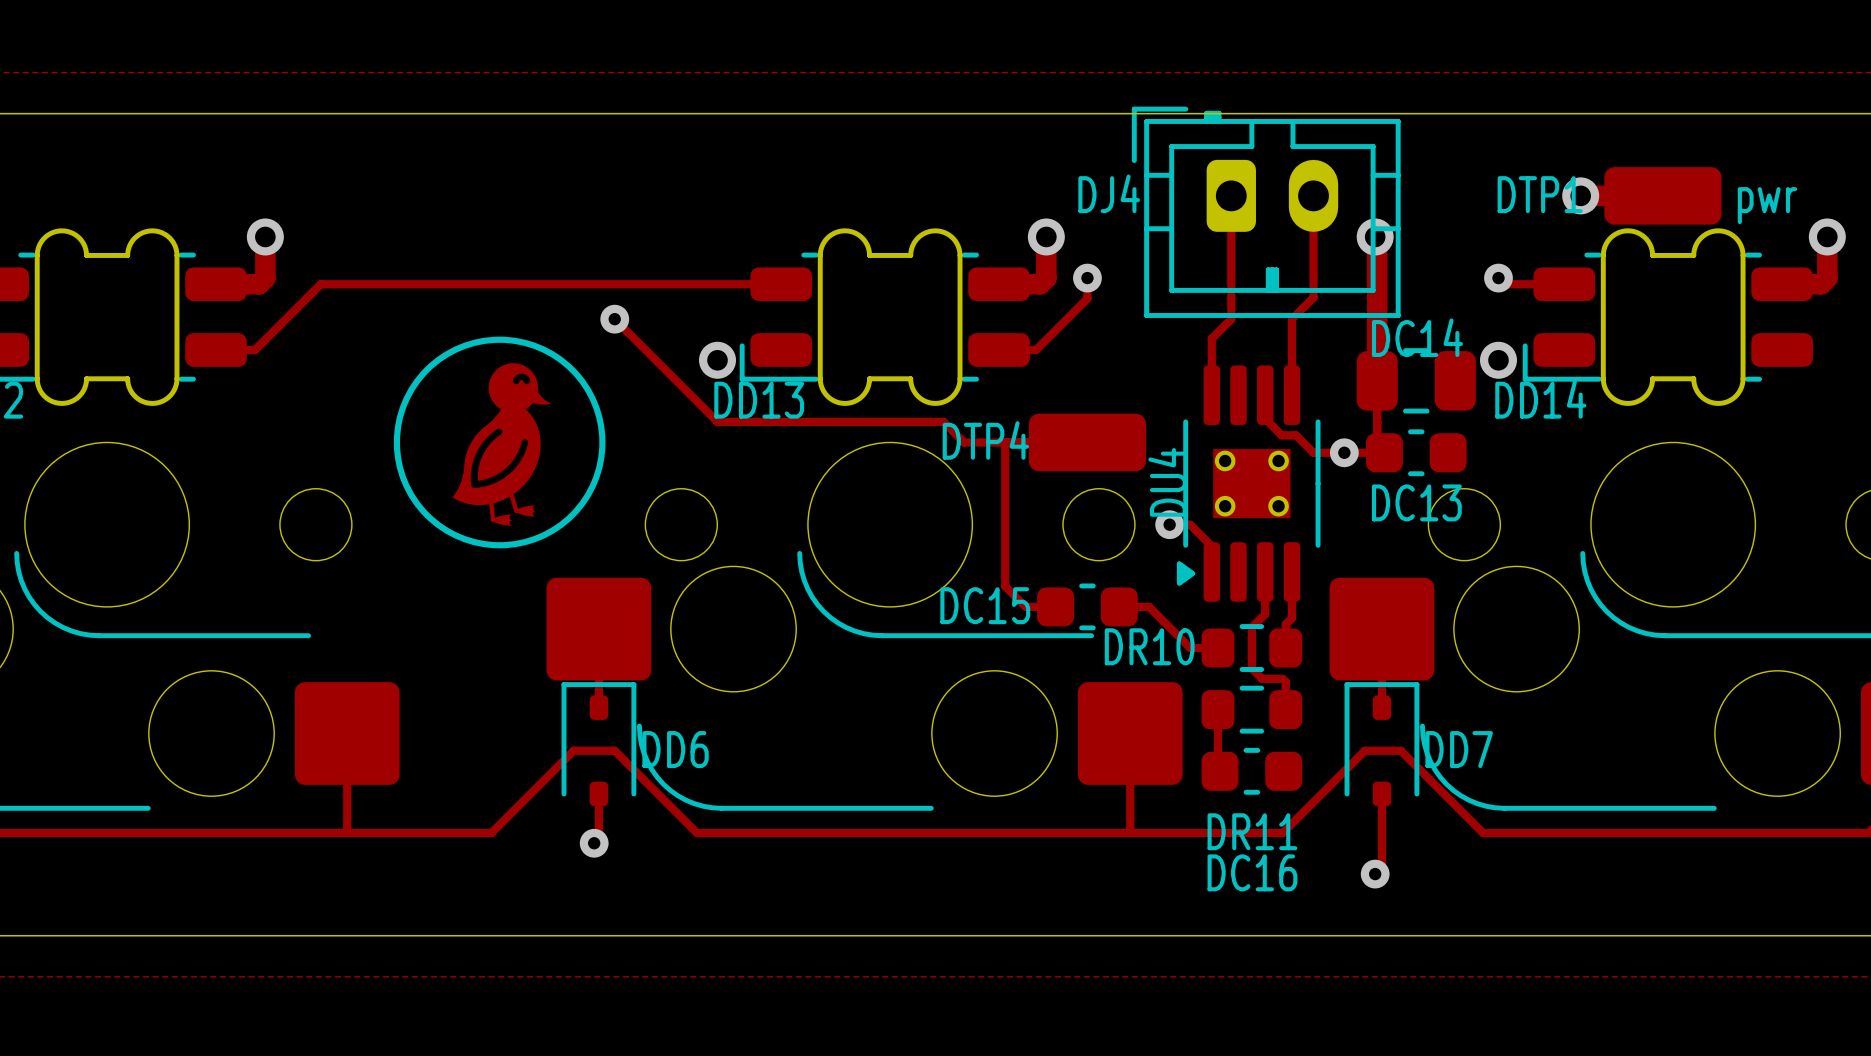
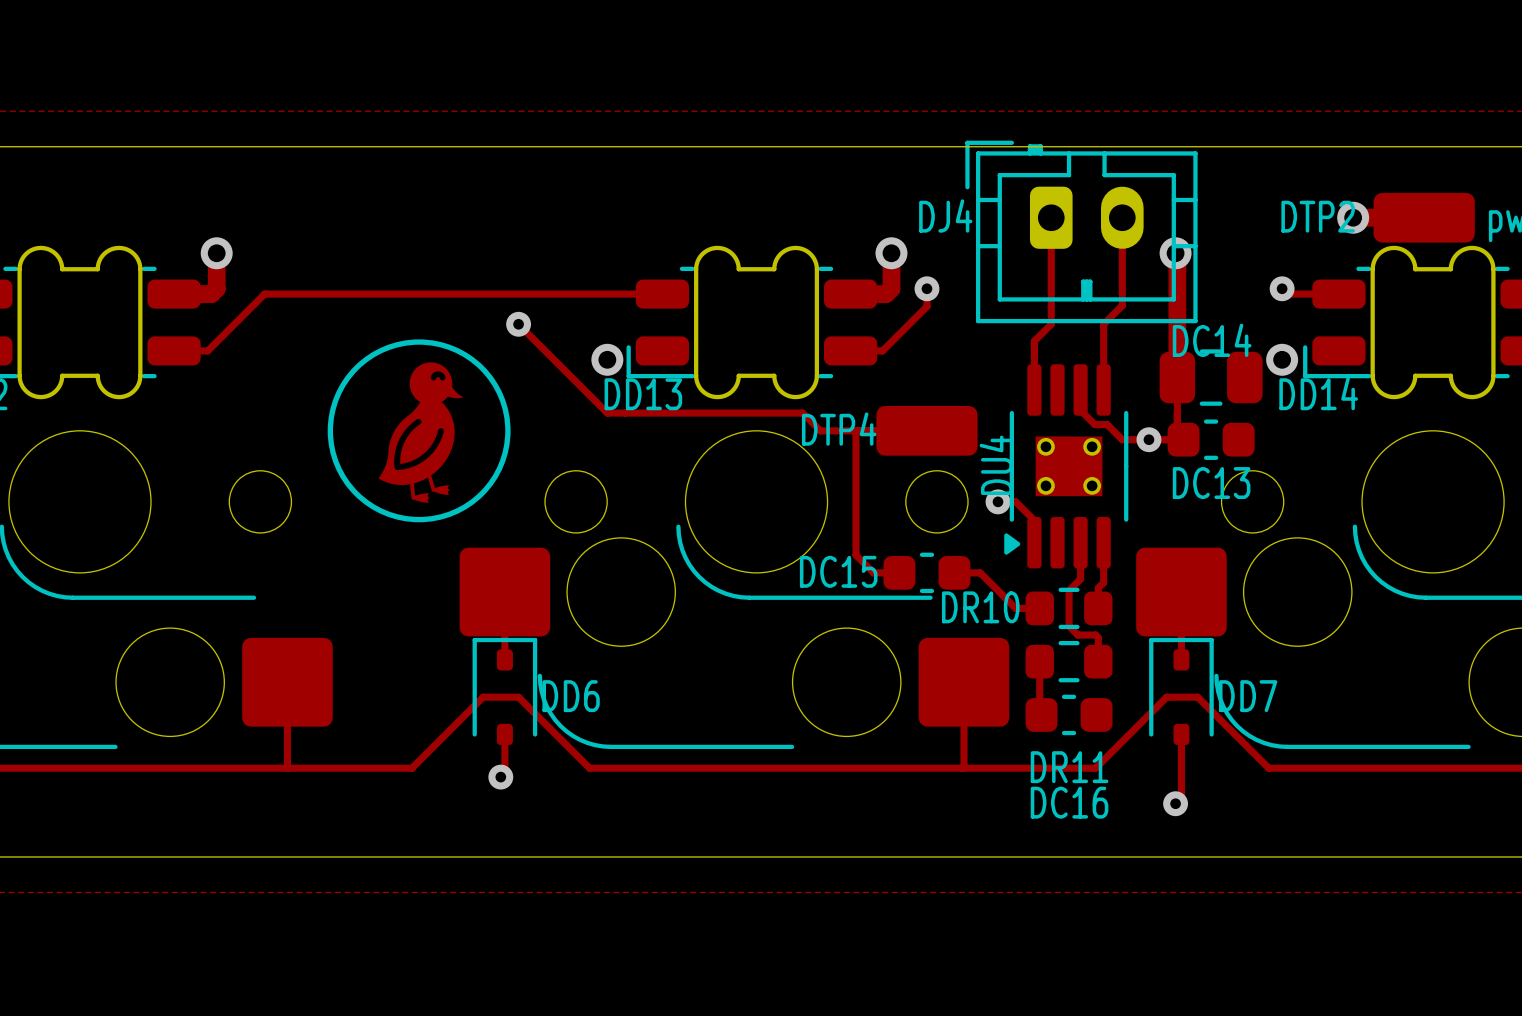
DTP1 name: DTP1 (1540, 194) -> DTP2 (1318, 216)

